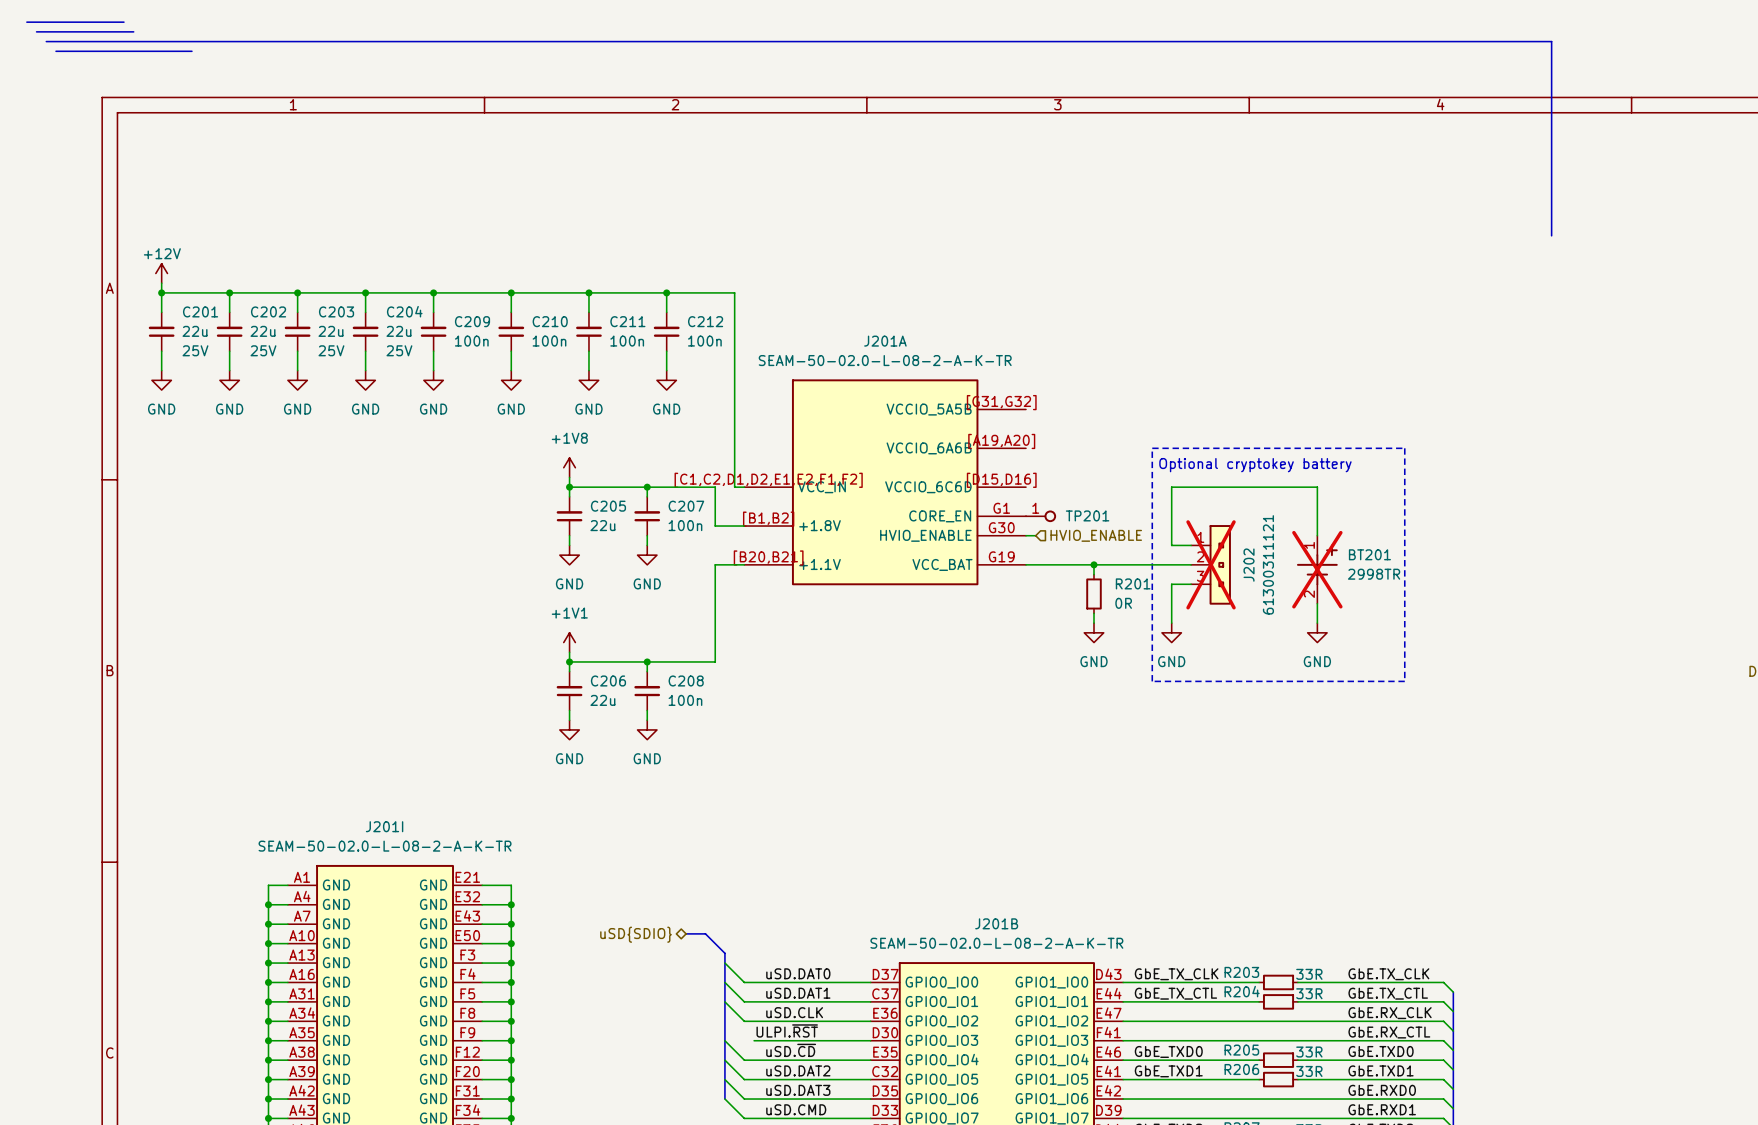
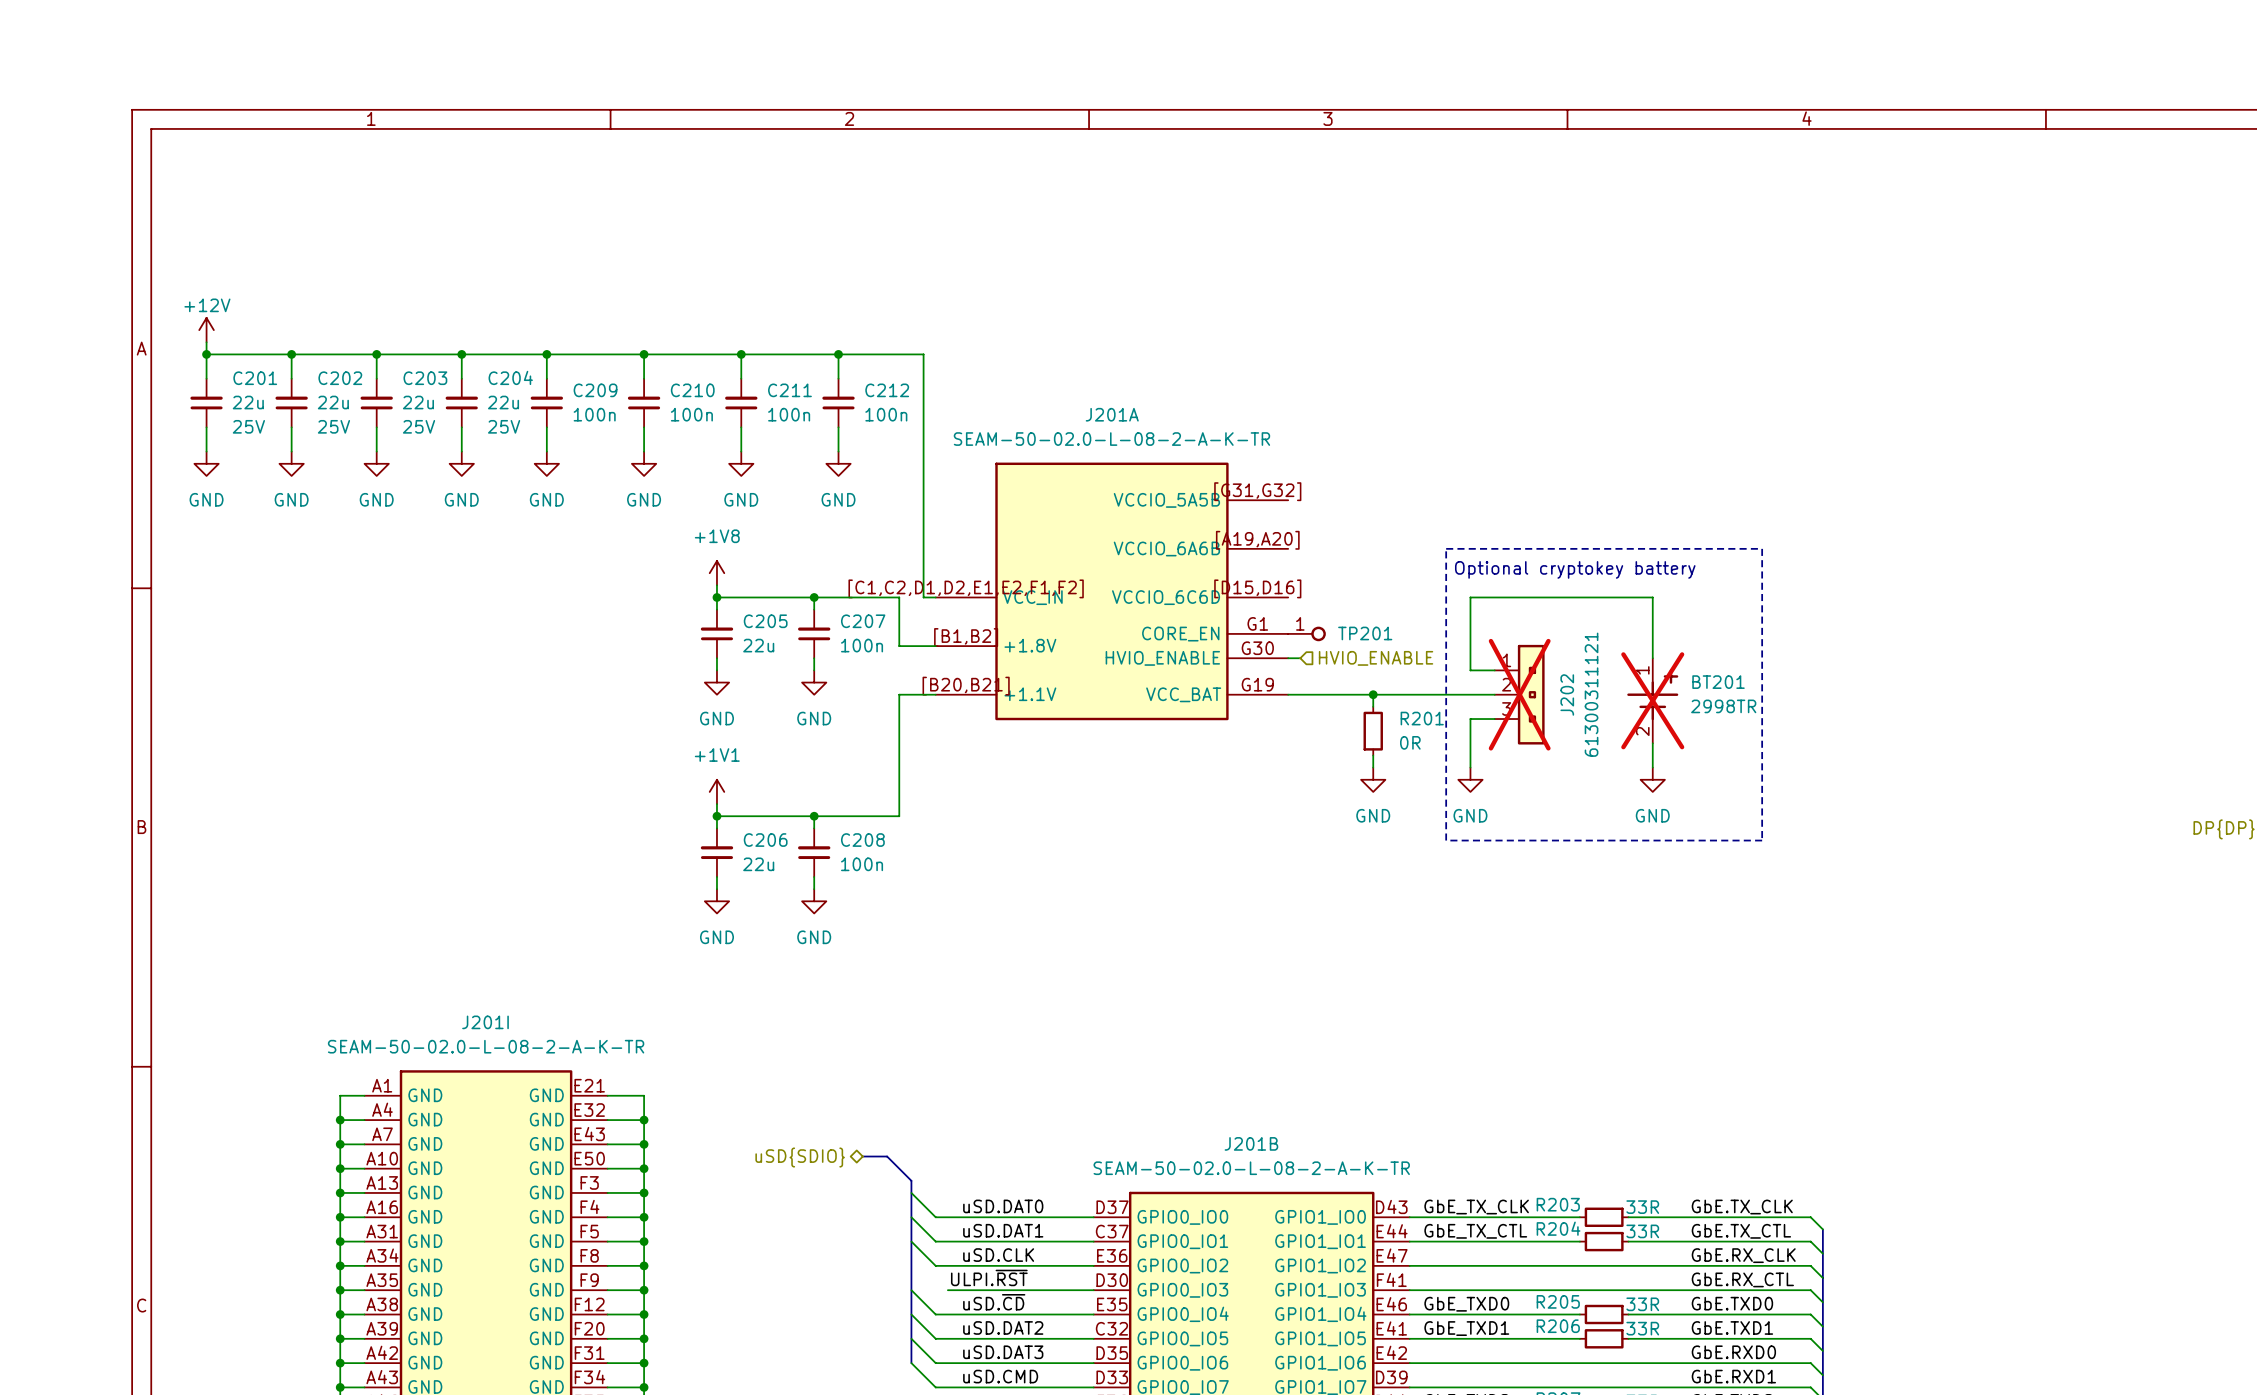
bus: (26, 22) (123, 22) -> none
bus: (36, 31) (133, 31) -> none
bus: (46, 41) (1551, 41) (1551, 235) -> none
bus: (55, 51) (191, 51) -> none

